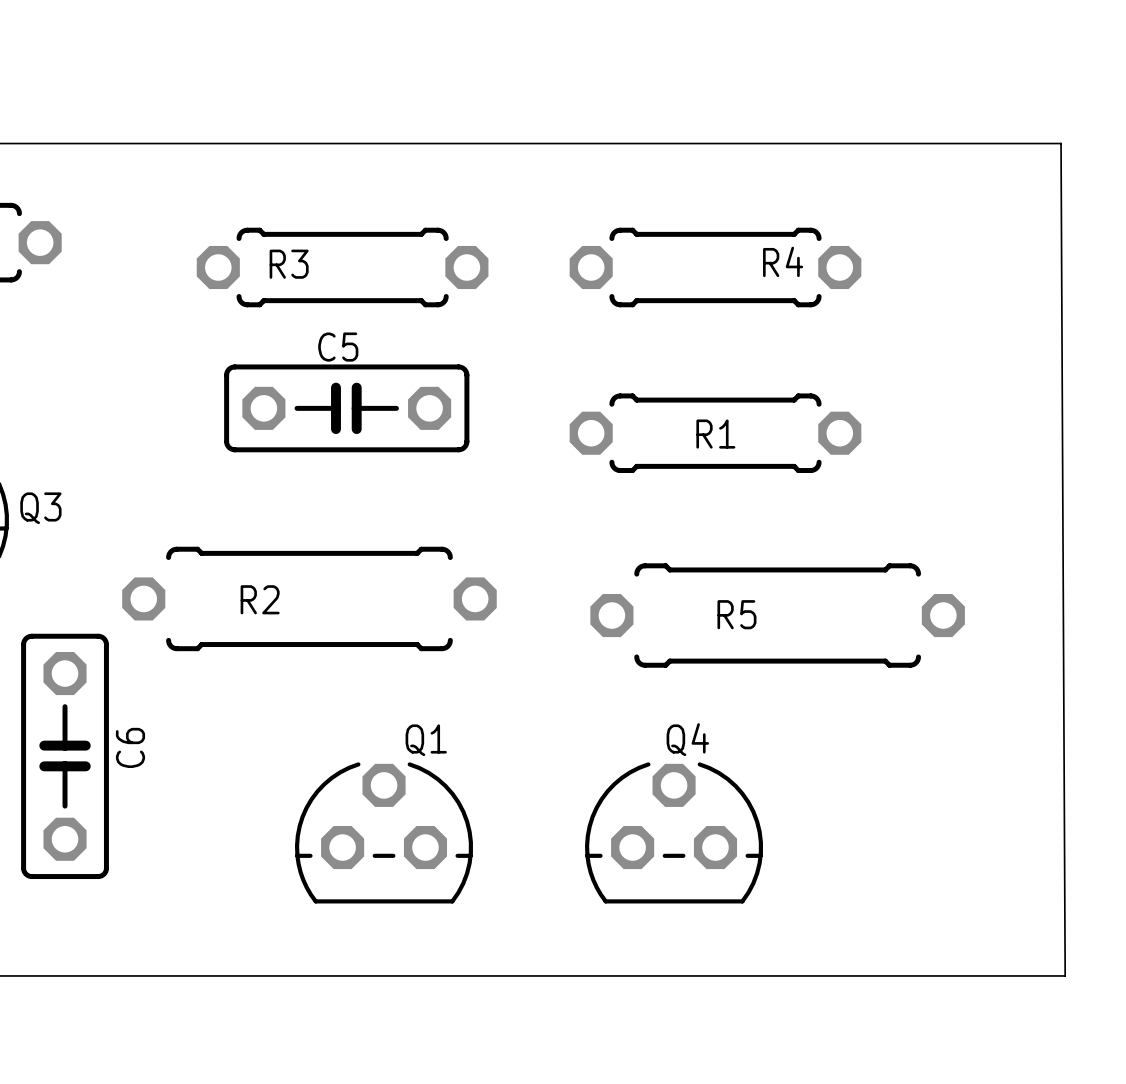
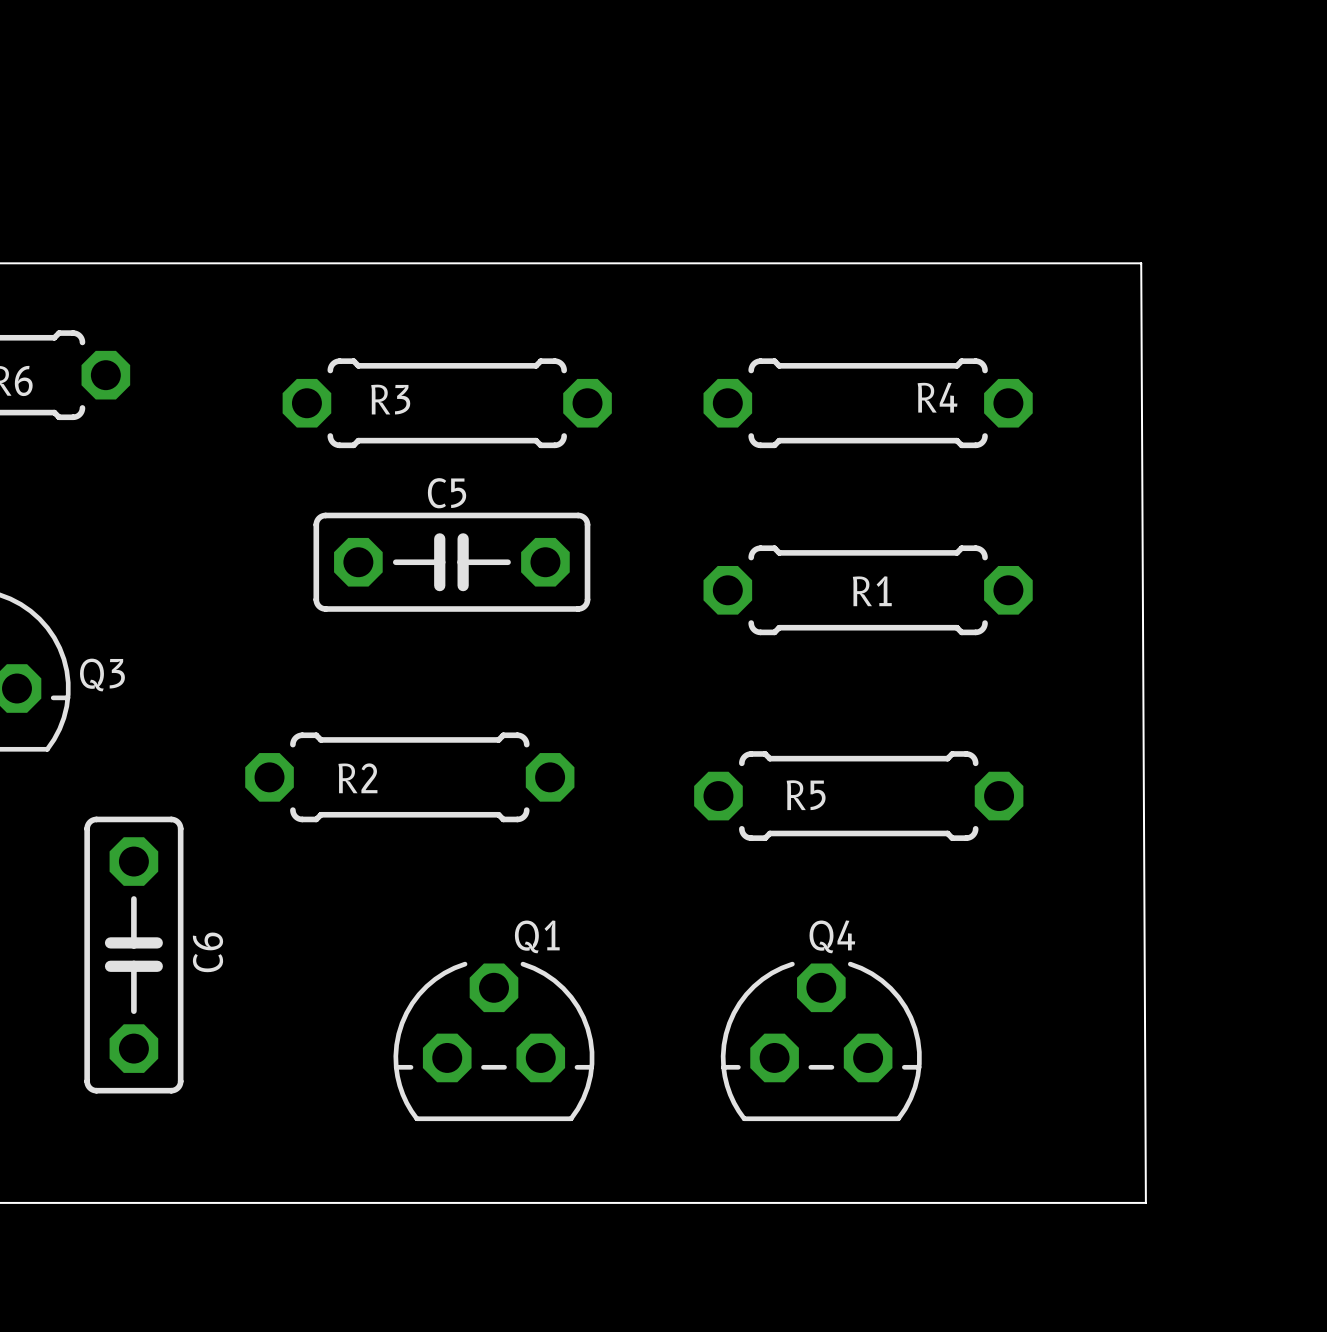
board edge: (957, 143) (1061, 143) (1065, 975) (961, 975) -> (1141, 263) (1145, 1202)
R2 footprint: [122, 546, 497, 652] -> [245, 732, 575, 823]
R5 footprint: [590, 563, 965, 668] -> [694, 751, 1024, 841]

